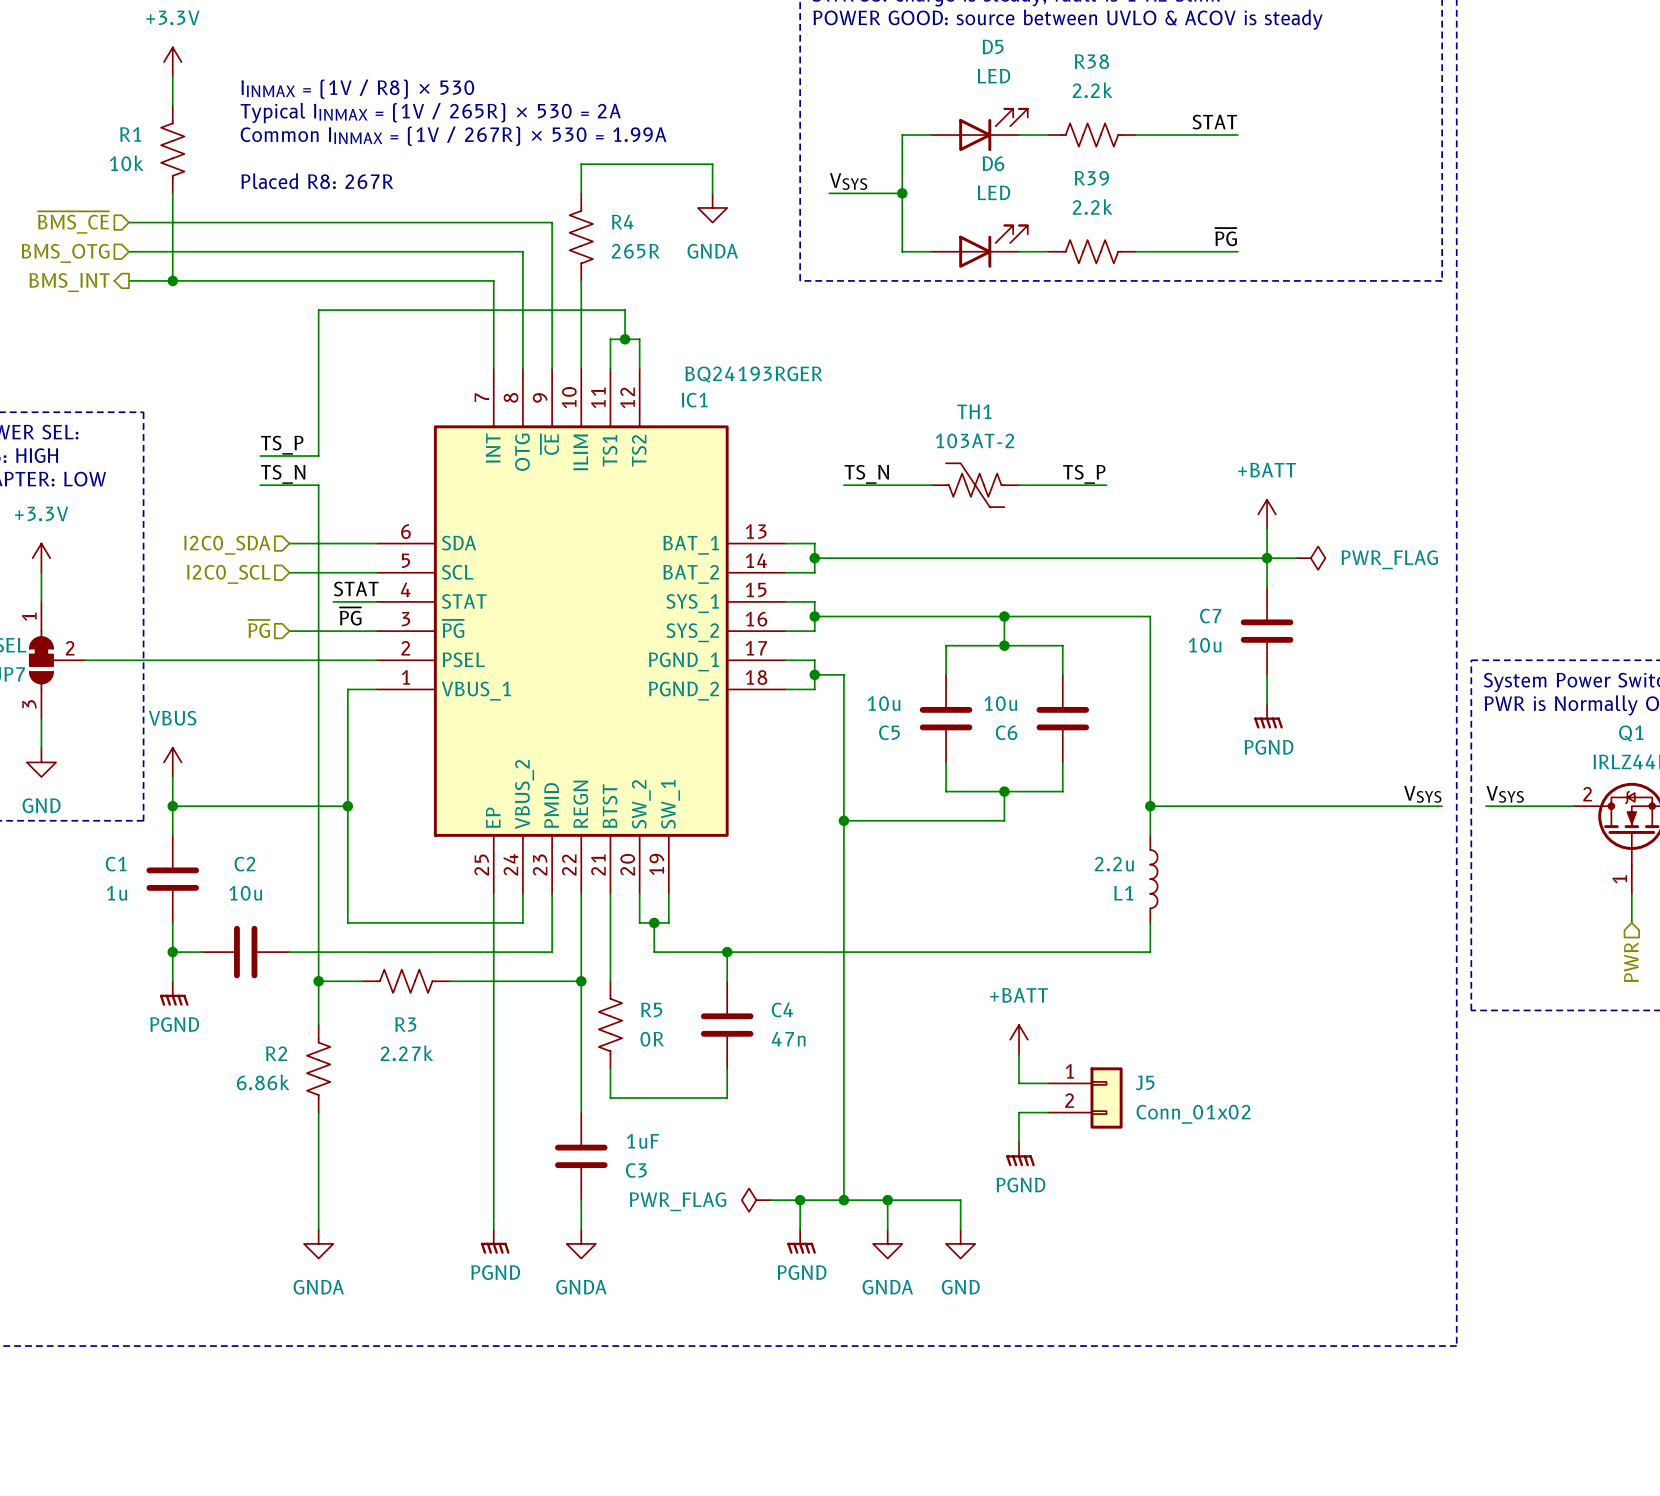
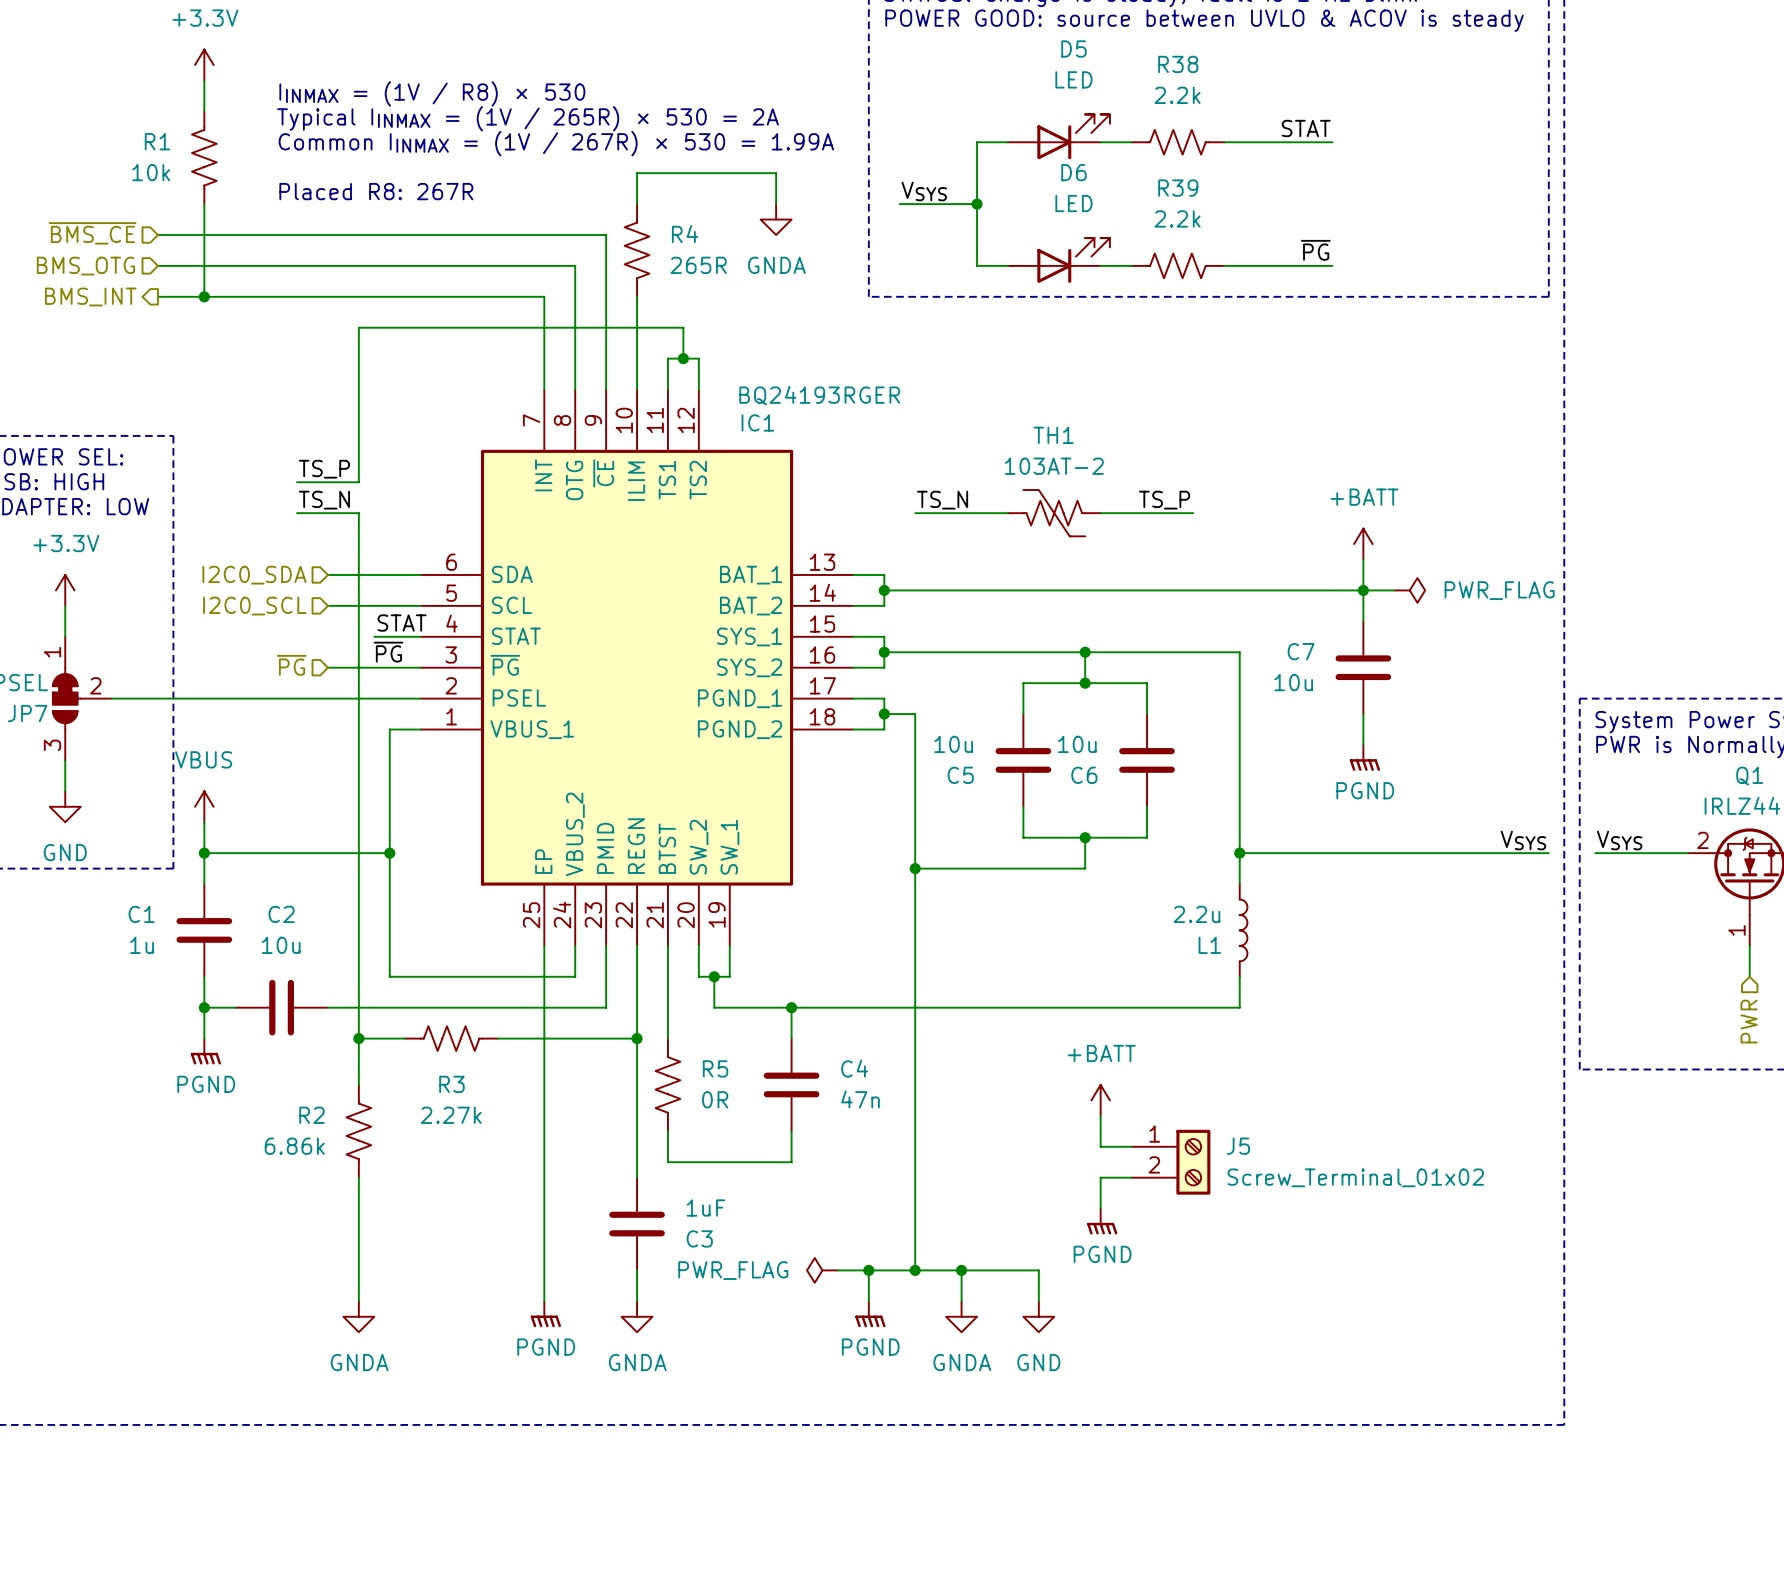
J5 symbol: [1048, 1067, 1123, 1129] -> [1131, 1129, 1211, 1195]
J5 value: Conn_01x02 (1193, 1114) -> Screw_Terminal_01x02 (1355, 1177)

